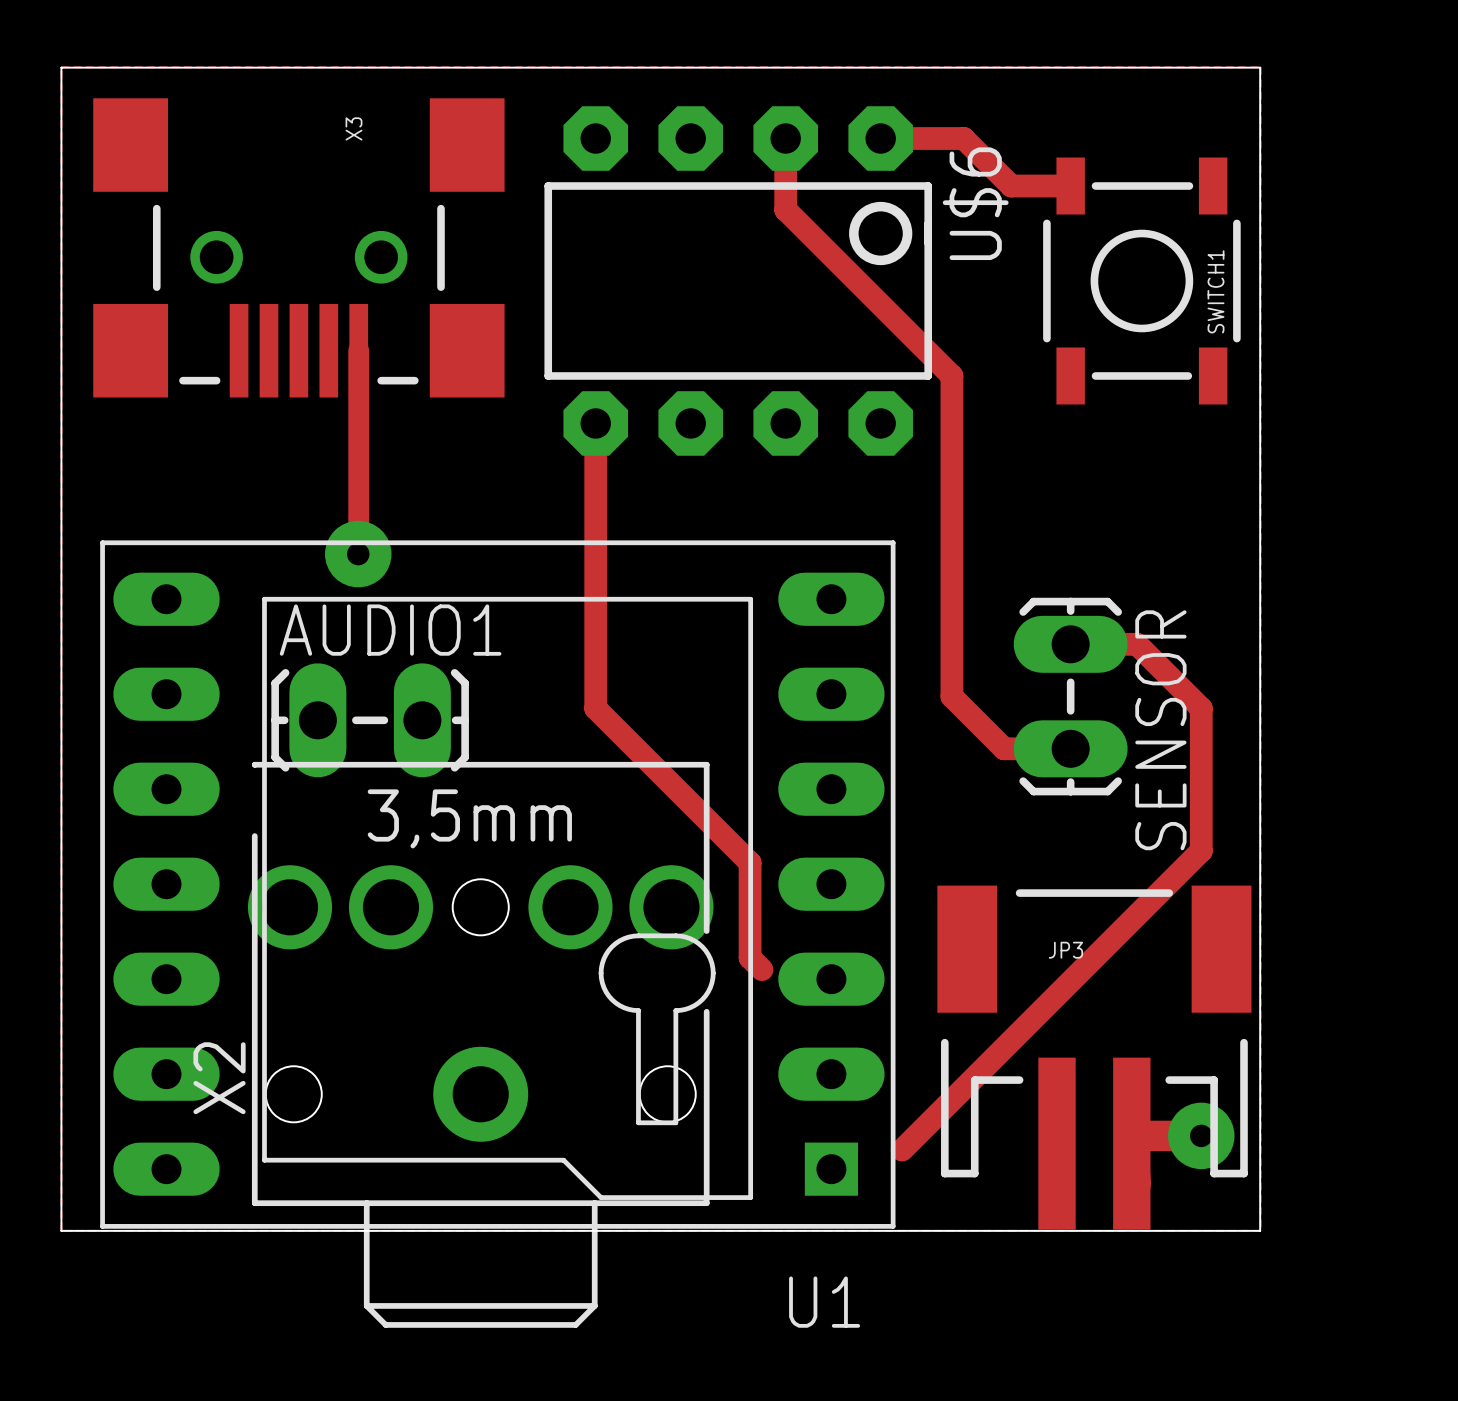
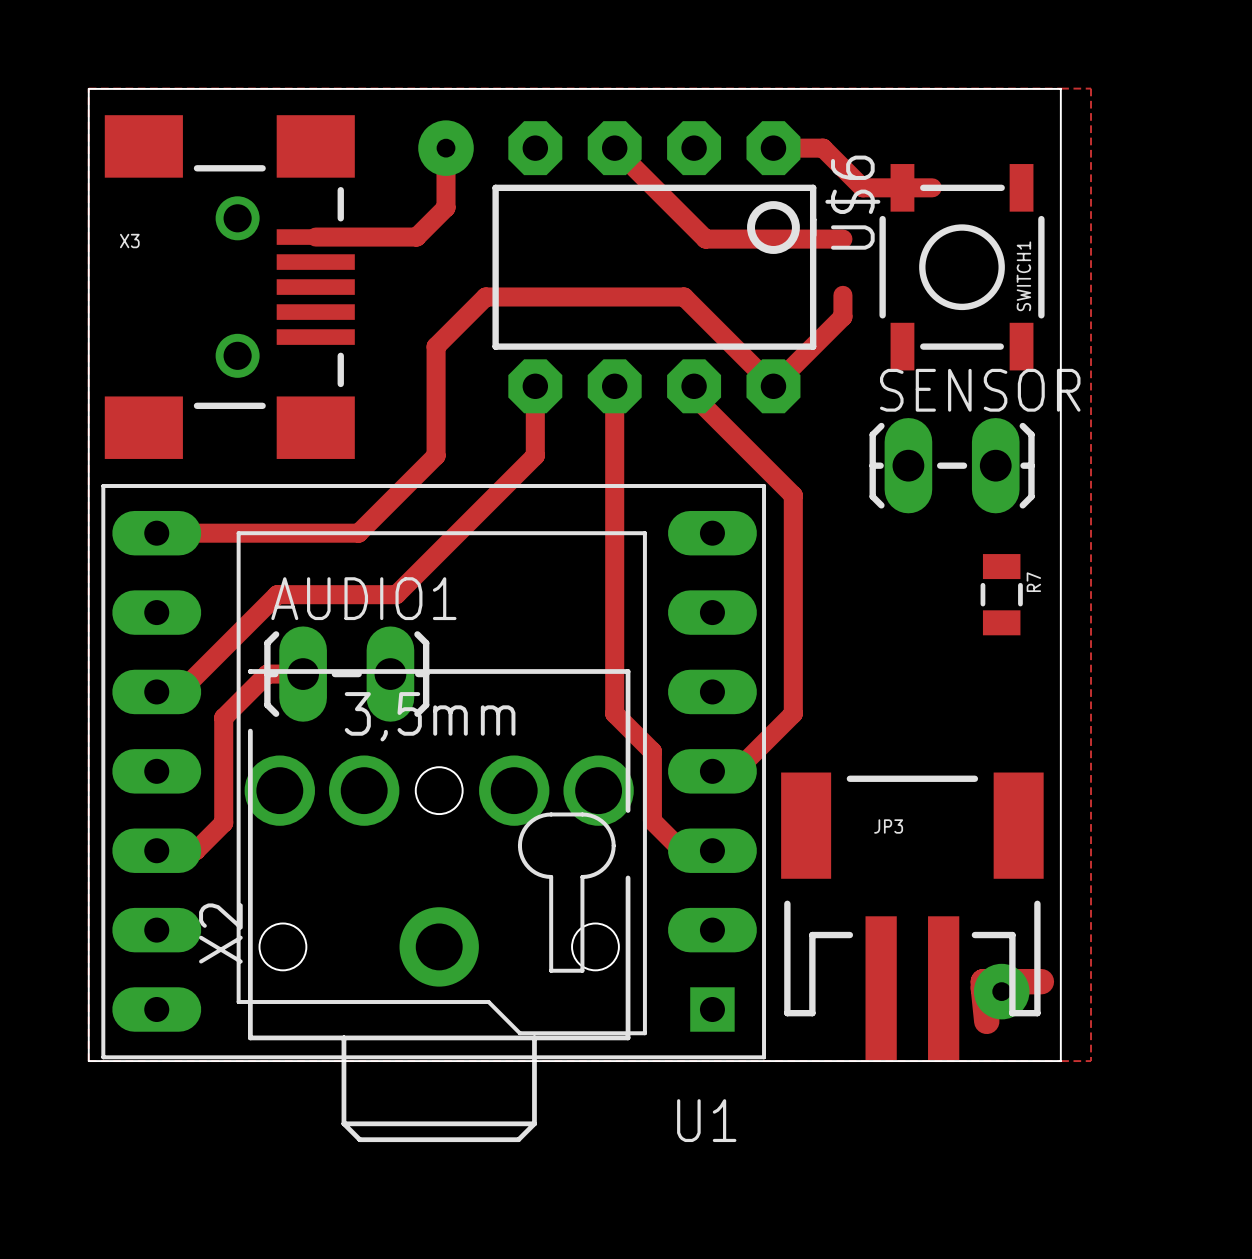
board edge: (1224, 67) (1260, 67) (1260, 1230) (1224, 1230) -> (1060, 88) (1060, 1061)
track: none -> (446, 148) (446, 207) (416, 237) (315, 237)
via: none -> (446, 148)
track: none -> (614, 148) (705, 239) (842, 239)
track: (785, 138) (785, 209) (951, 375) (951, 696) (1004, 748) (1070, 748) -> none
track: (940, 138) (963, 138) (1011, 186) -> (823, 148) (862, 187) (882, 187)
X3 rotation: 0° (298, 247) -> 90° counterclockwise (229, 287)
SWITCH1 position: (1141, 280) -> (962, 267)
track: none -> (842, 295) (842, 316) (773, 386) (684, 296) (485, 296) (436, 346) (436, 455) (358, 533) (156, 533)
track: (358, 350) (358, 553) -> none
track: none -> (694, 386) (694, 396) (793, 495) (793, 713) (735, 771) (712, 771)
track: (595, 506) (595, 708) (750, 862) (750, 957) -> (614, 386) (614, 713) (652, 751) (652, 820) (664, 832)
track: none -> (535, 455) (396, 594) (277, 594) (180, 691) (156, 691)
via: (358, 554) -> none
track: (1070, 644) (1137, 644) (1201, 708) (1201, 850) (902, 1150) -> none
R7: none -> (1001, 594)
SENSOR rotation: 0° (1070, 696) -> 90° clockwise (952, 465)
SENSOR position: (1070, 696) -> (952, 465)
AUDIO1 position: (370, 720) -> (346, 674)
SENSOR name position: SENSOR (1160, 730) -> SENSOR (980, 390)
track: none -> (303, 674) (267, 674) (223, 717) (223, 822) (195, 850) (156, 850)
U1 position: (497, 884) -> (433, 771)
JP3 position: (1094, 1057) -> (912, 916)
via position: (1201, 1135) -> (1001, 991)

